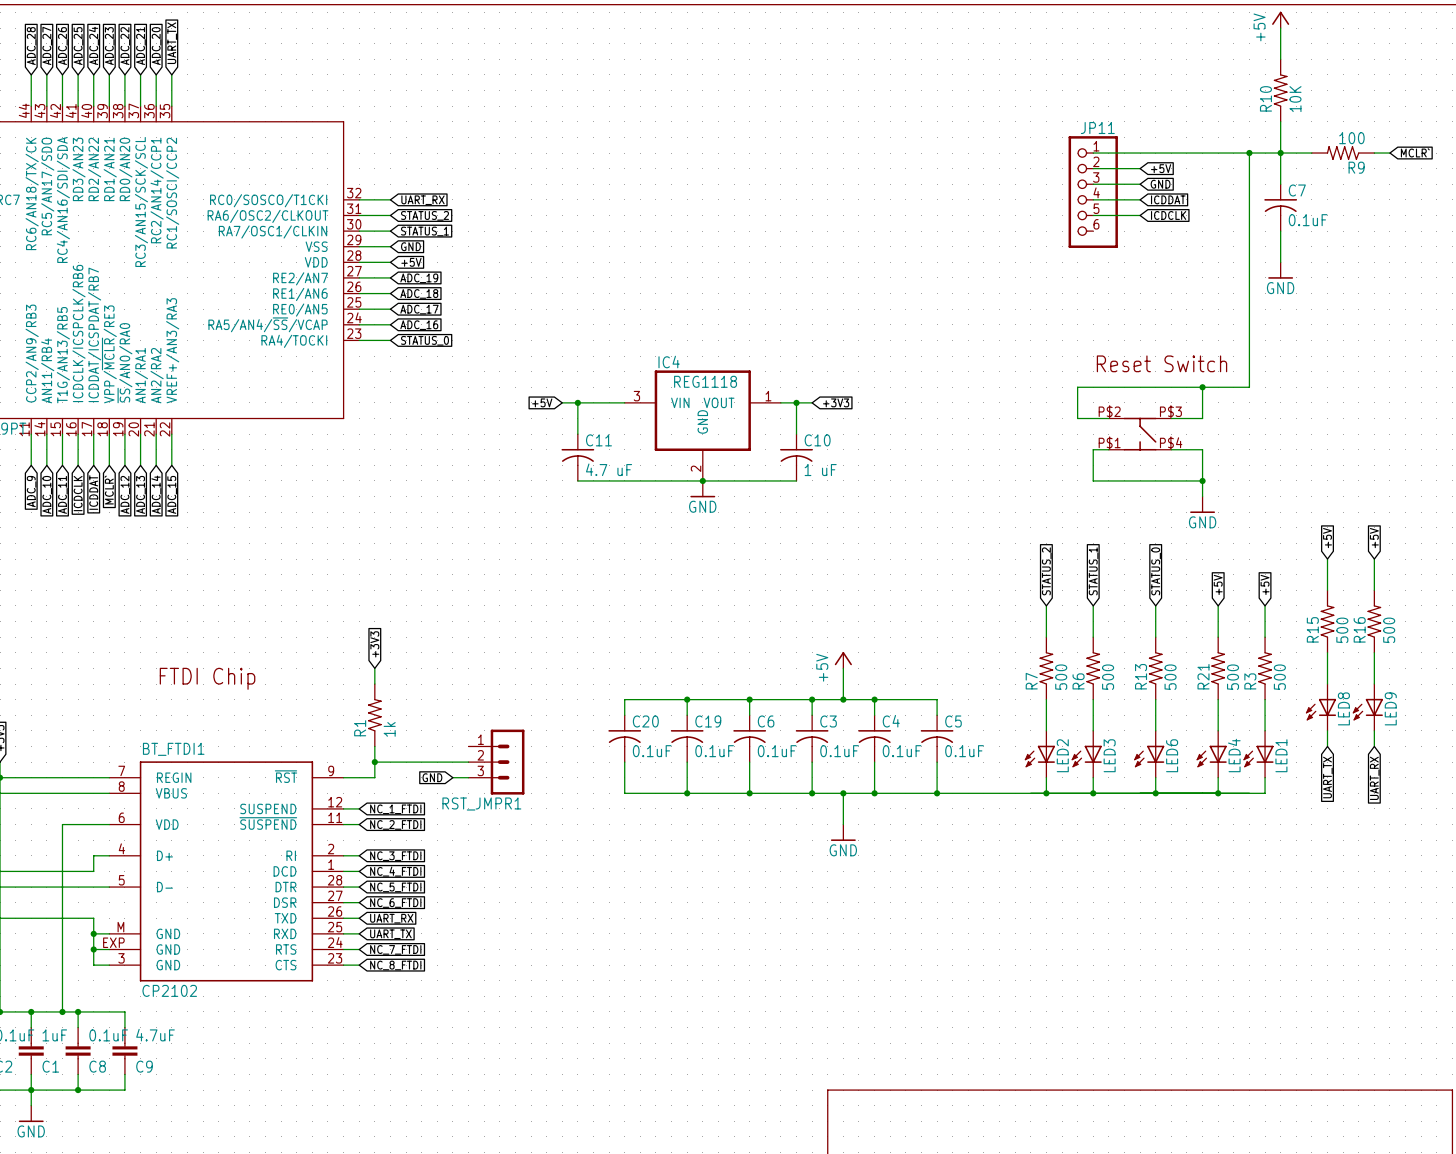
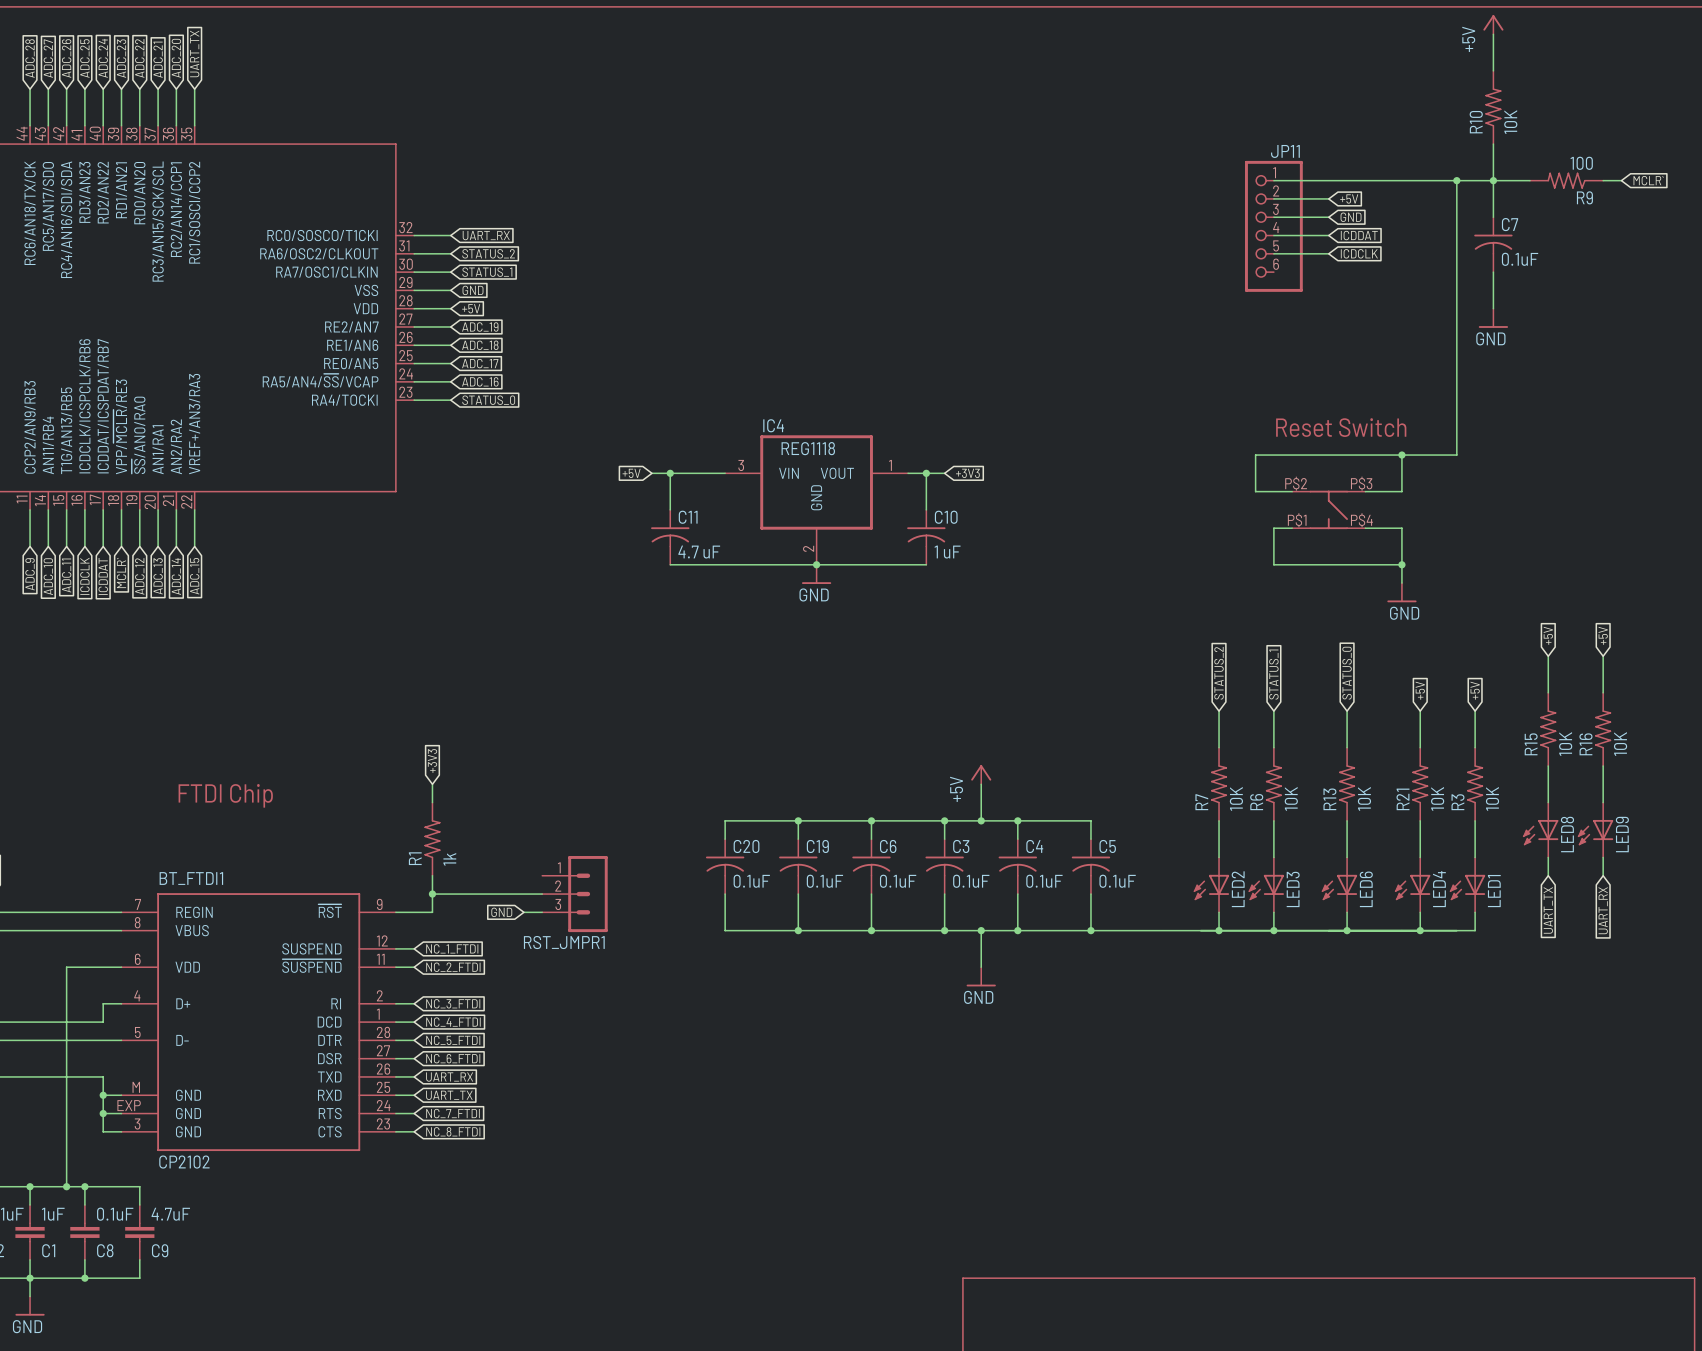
R15 value: 500 (1342, 630) -> 10K (1565, 744)
R16 value: 500 (1389, 630) -> 10K (1620, 744)
R7 value: 500 (1061, 677) -> 10K (1236, 798)
R6 value: 500 (1108, 677) -> 10K (1291, 798)
R13 value: 500 (1170, 677) -> 10K (1364, 798)
R21 value: 500 (1233, 677) -> 10K (1437, 798)
R3 value: 500 (1279, 677) -> 10K (1492, 798)

